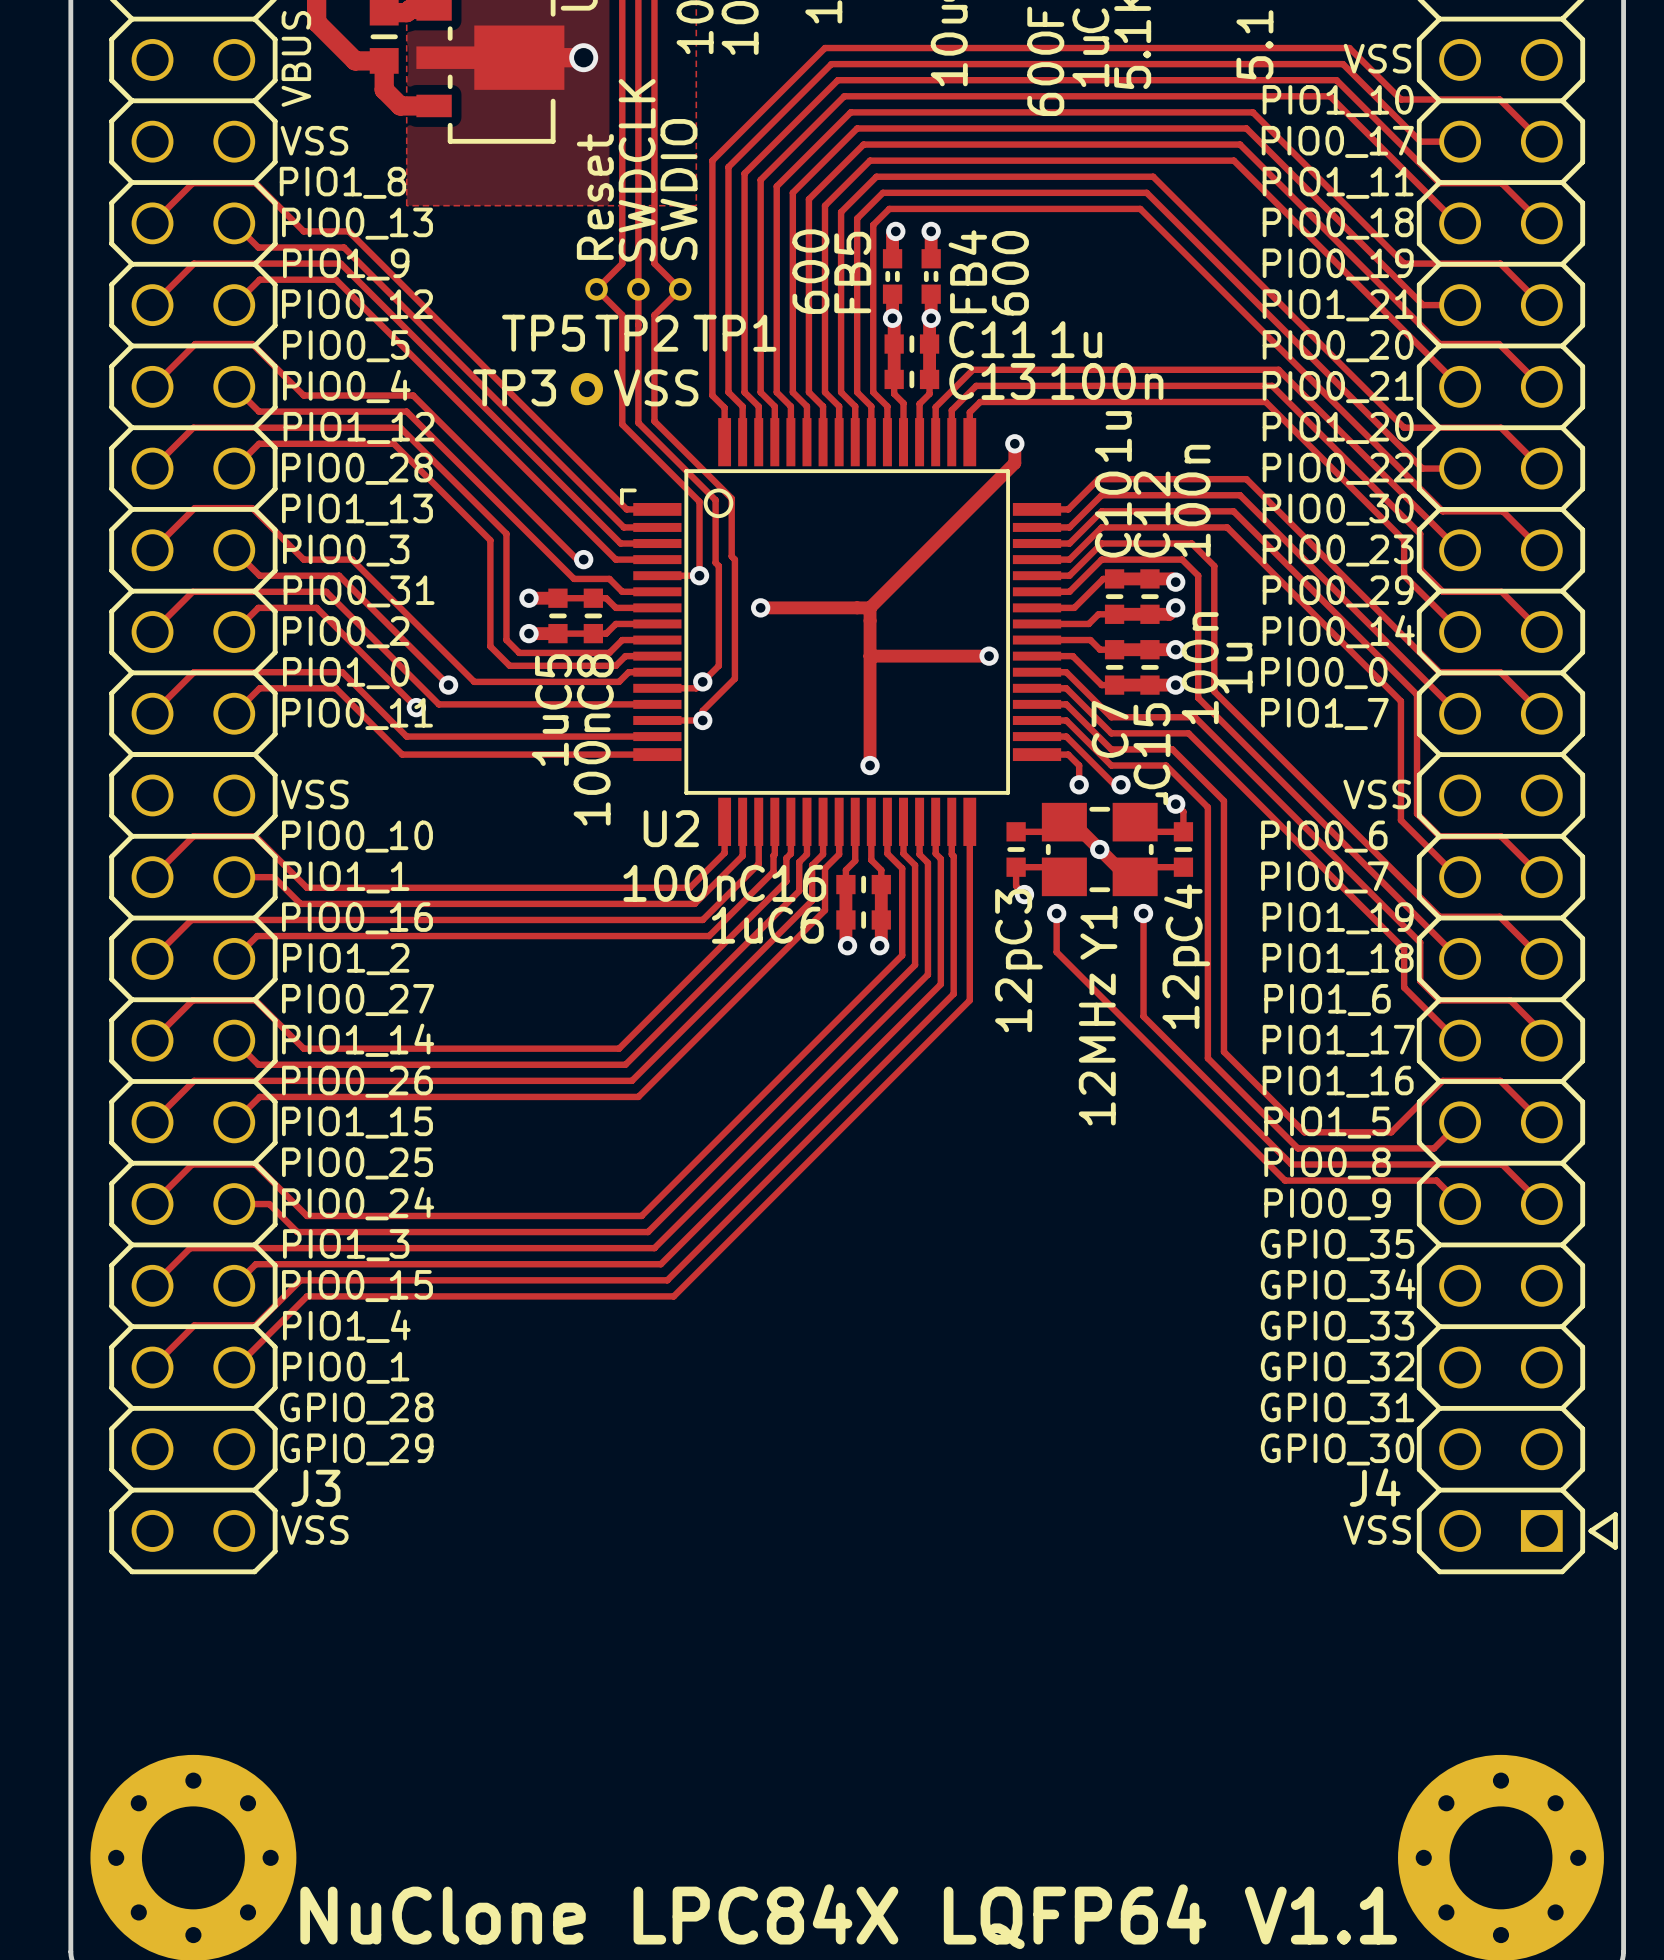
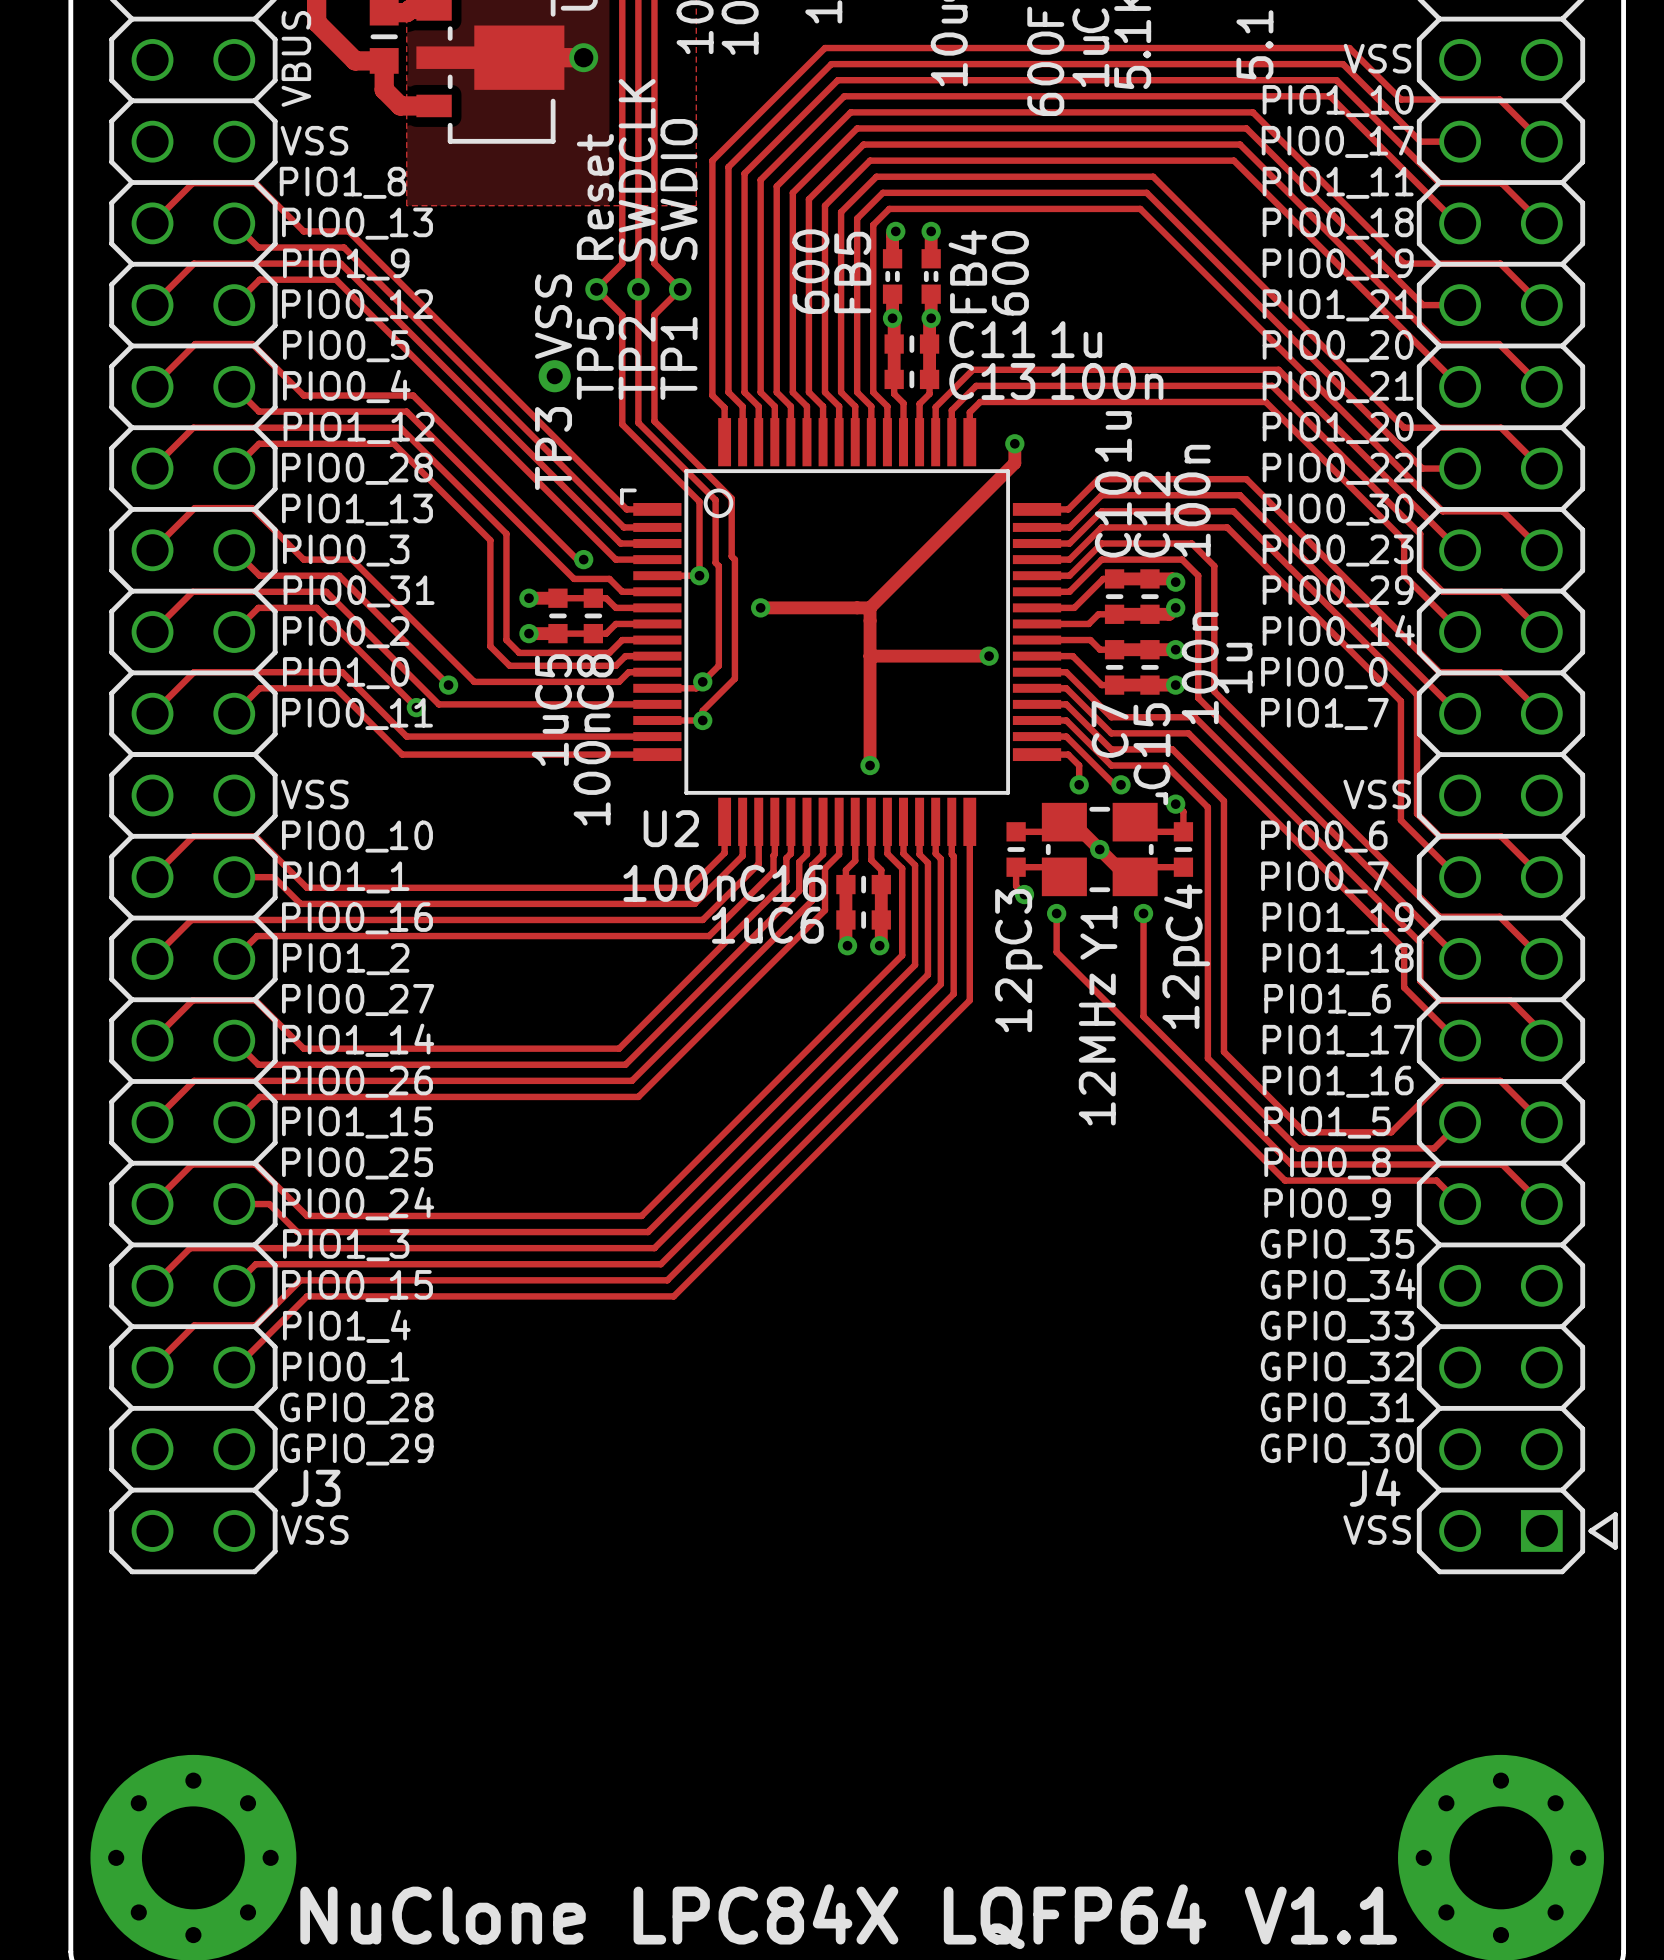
TP5 name rotation: 0° (543, 333) -> 90° counterclockwise (595, 358)
TP2 name rotation: 0° (636, 333) -> 90° counterclockwise (637, 358)
TP1 name rotation: 0° (734, 333) -> 90° counterclockwise (679, 358)
TP3 name rotation: 0° (514, 387) -> 90° counterclockwise (553, 448)
TP3 value rotation: 0° (656, 387) -> 90° counterclockwise (553, 316)
TP3 position: (586, 389) -> (554, 376)

